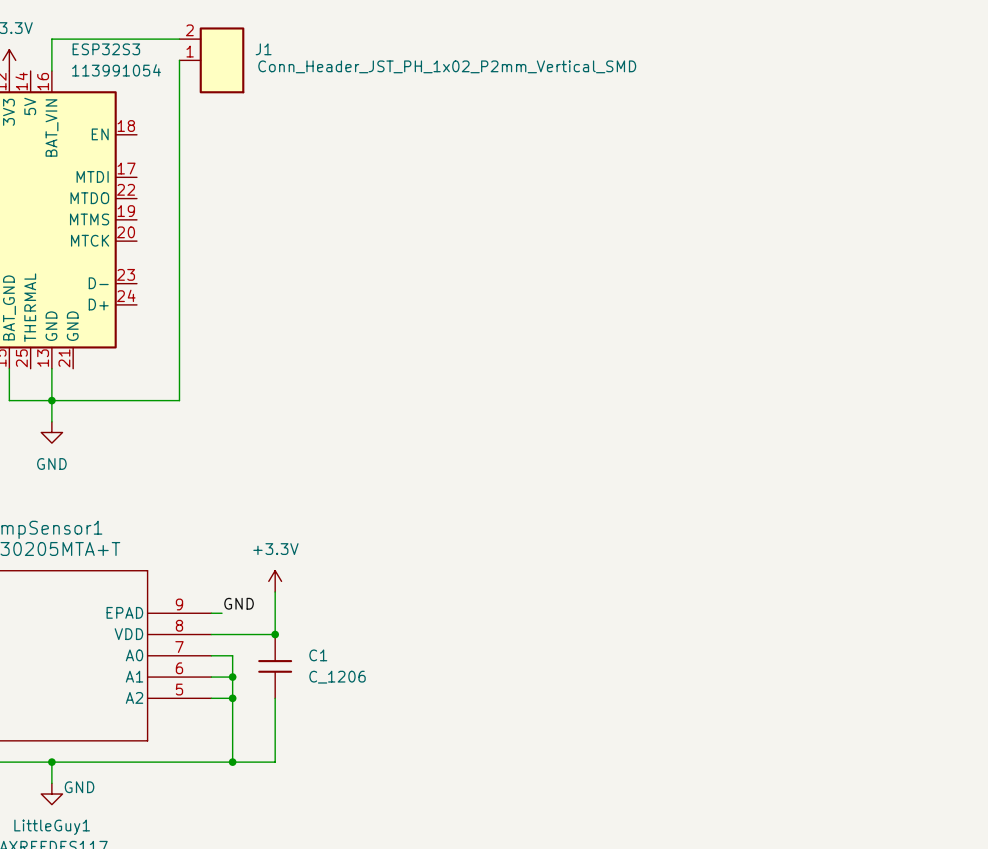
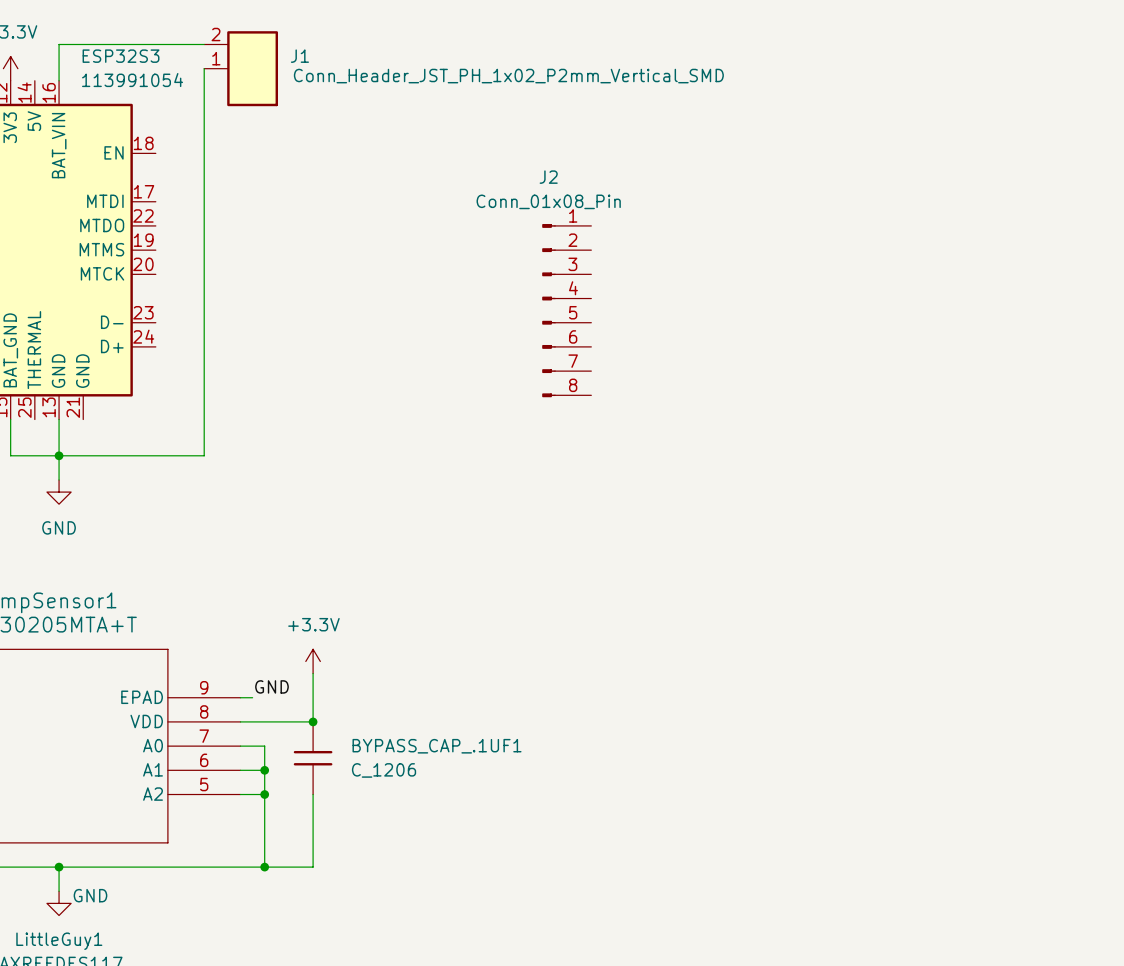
J2: none -> Conn_01x08_Pin (566, 310)
C1 name: C1 (318, 655) -> BYPASS_CAP_.1UF1 (437, 746)

